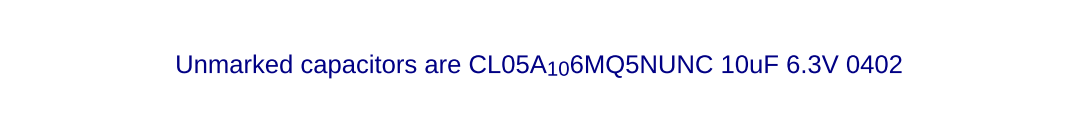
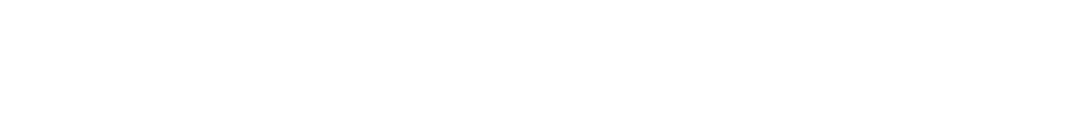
text: Unmarked capacitors are CL05A106MQ5NUNC 10uF 6.3V 0402 (539, 66) -> none

